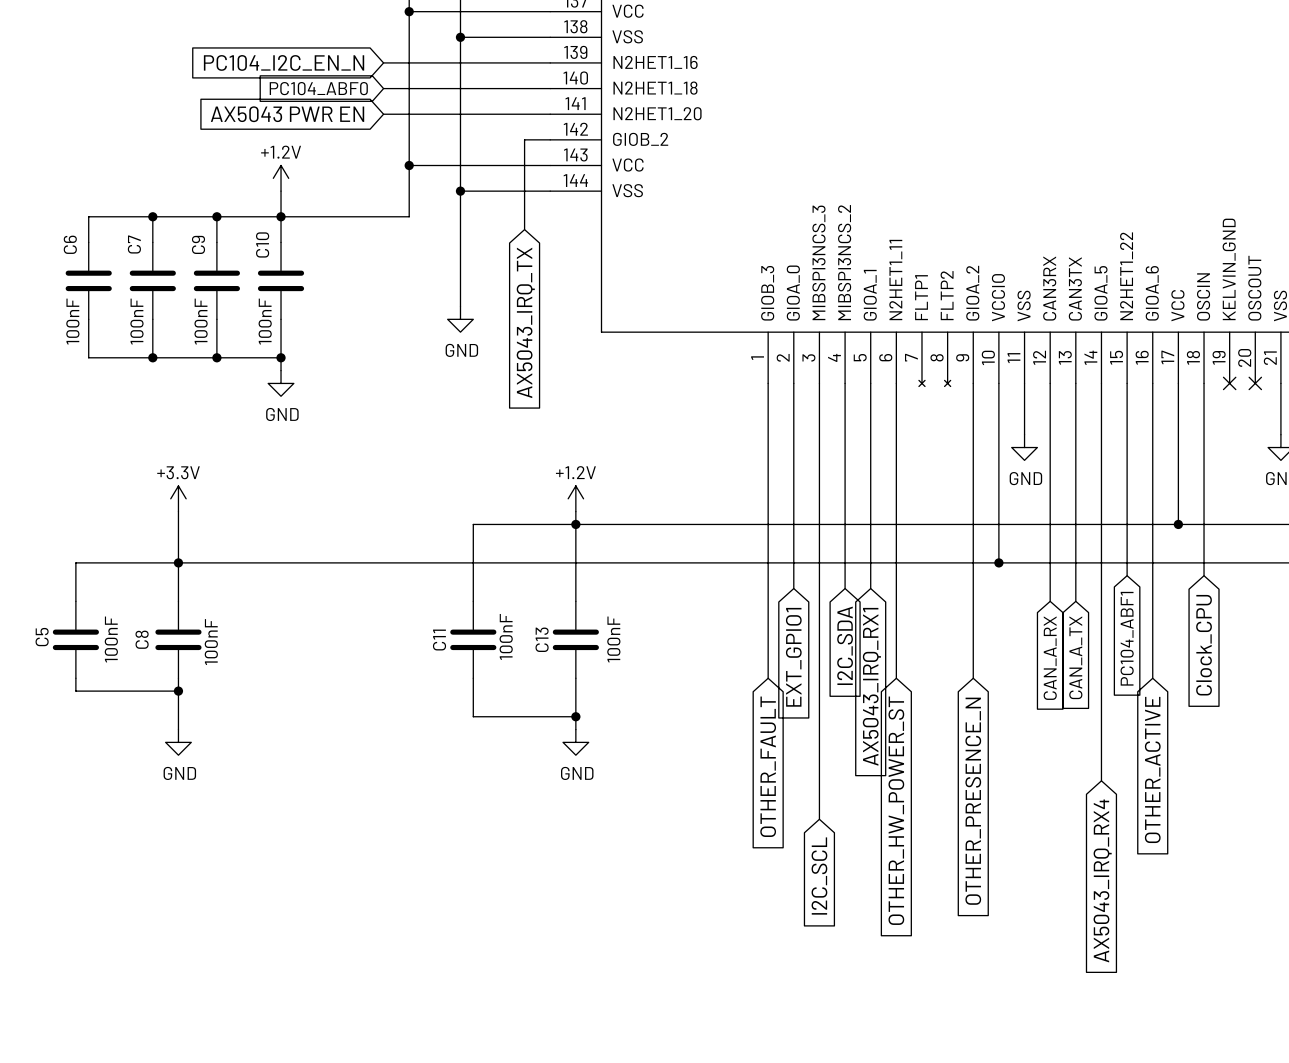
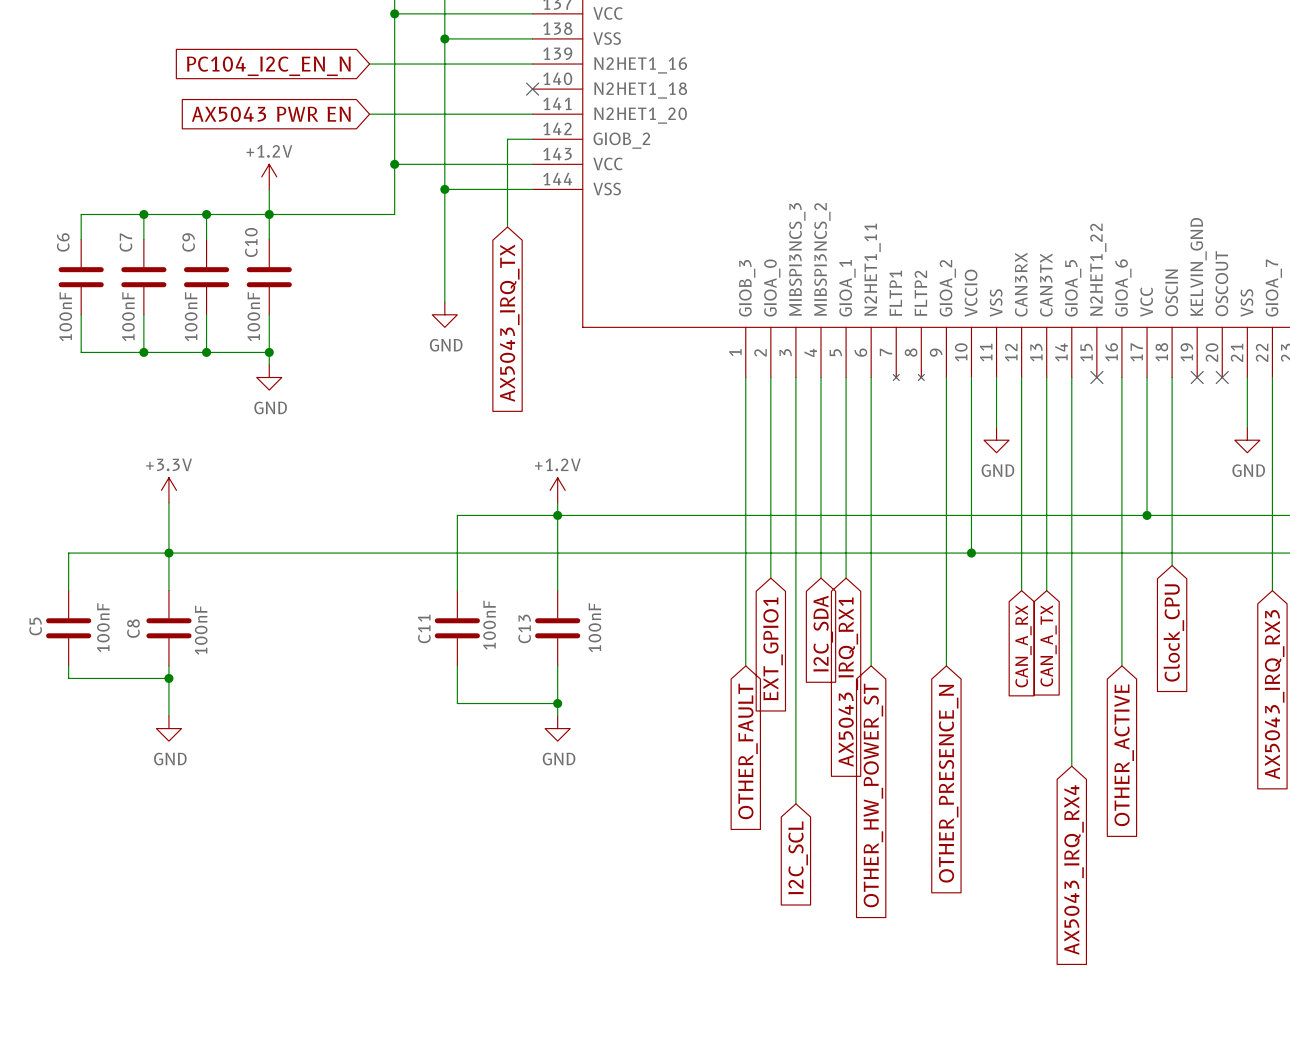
global label: PC104_ABF0 (318, 88) -> none
wire: (383, 88) (550, 88) -> none
no-connect mark: none -> (532, 89)
wire: (1127, 383) (1127, 575) -> none
no-connect mark: none -> (1096, 377)
global label: PC104_ABF1 (1127, 638) -> none

